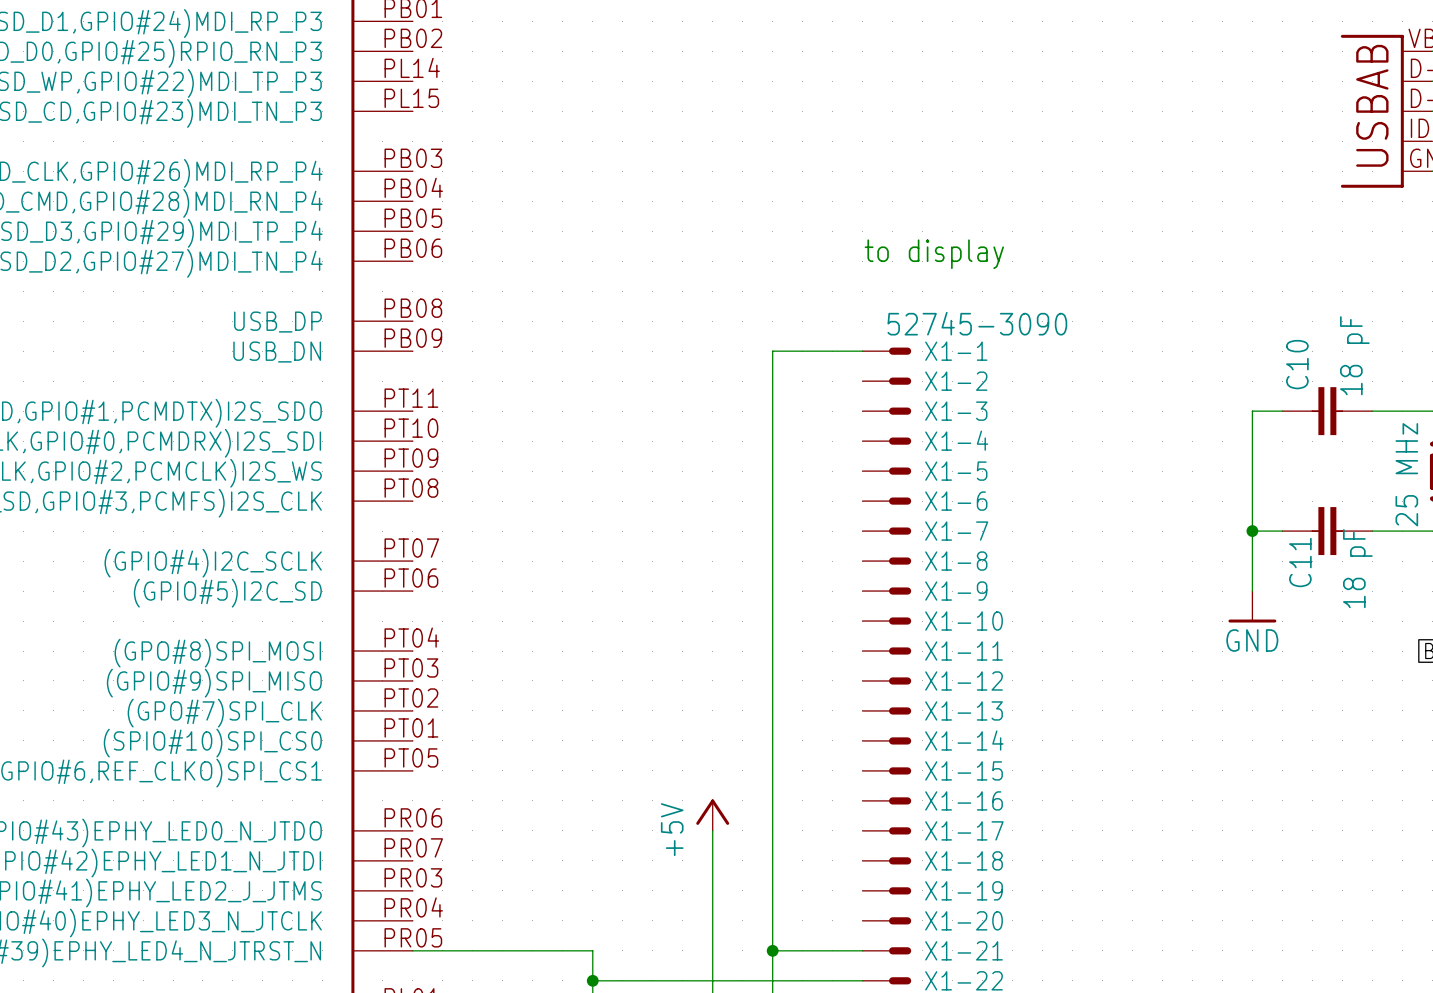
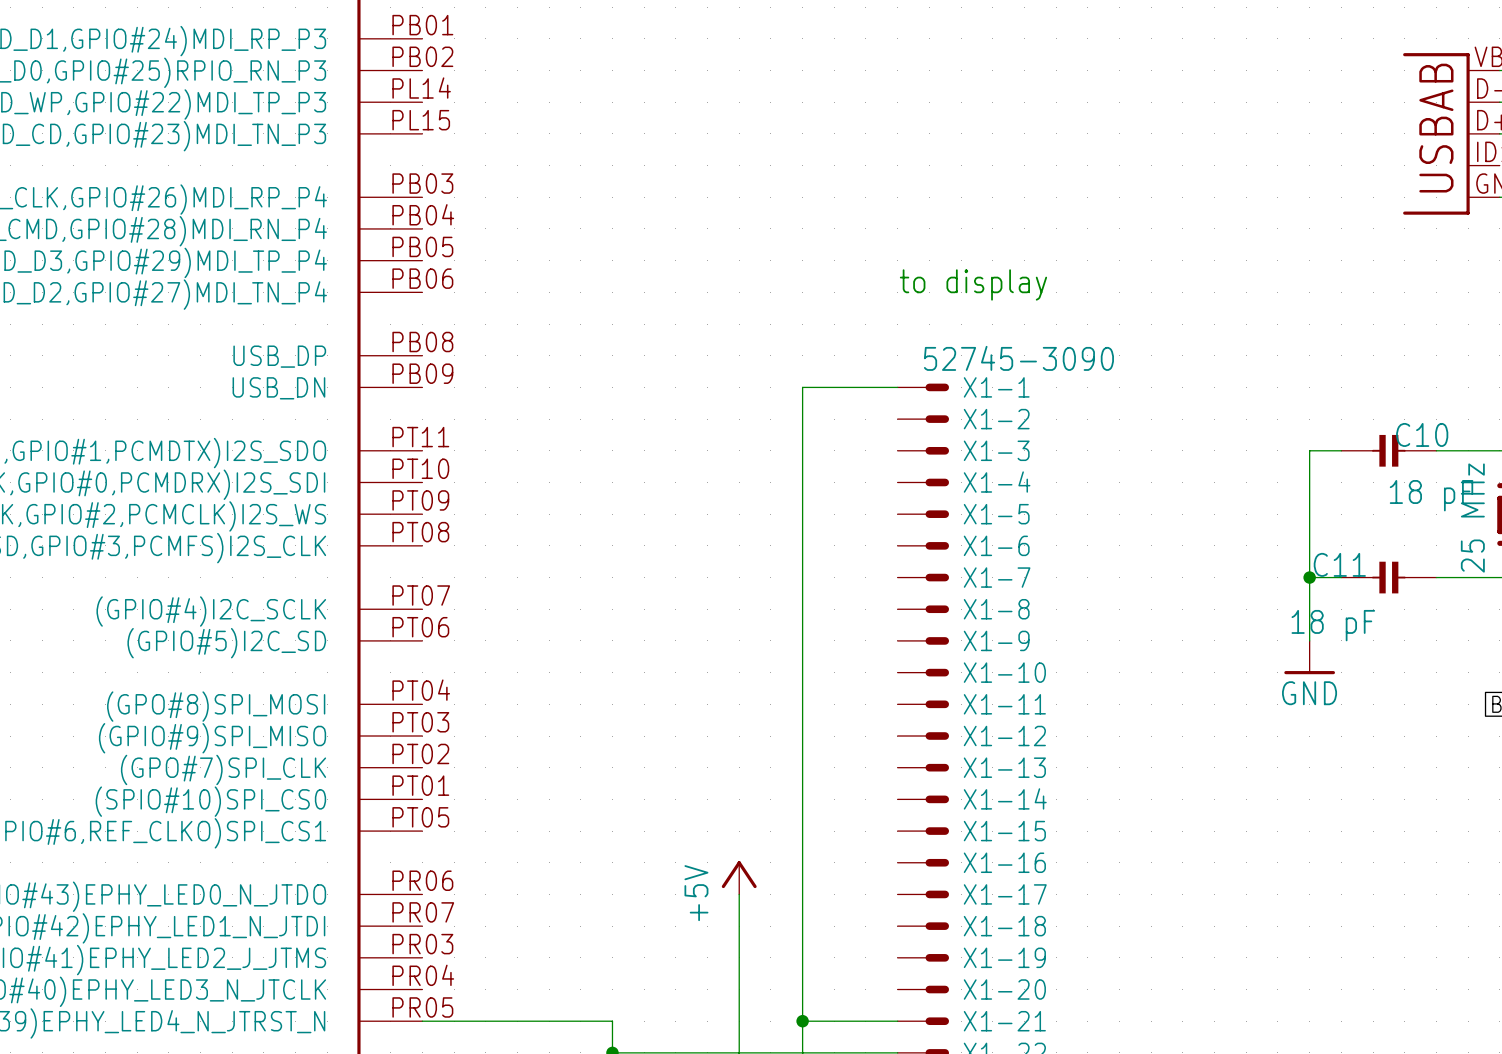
C10 value rotation: 0° (1354, 355) -> 90° clockwise (1431, 495)
C10 value position: 18 pF (1354, 355) -> 18 pF (1431, 495)
C10 name rotation: 0° (1297, 364) -> 90° clockwise (1422, 434)
C10 name position: C10 (1297, 364) -> C10 (1422, 434)
C10 symbol: [1282, 387, 1373, 436] -> [1341, 434, 1437, 467]
C11 symbol: [1282, 507, 1373, 556] -> [1341, 561, 1437, 594]
C11 name rotation: 0° (1300, 562) -> 90° clockwise (1339, 564)
C11 value rotation: 0° (1357, 568) -> 90° clockwise (1333, 625)

